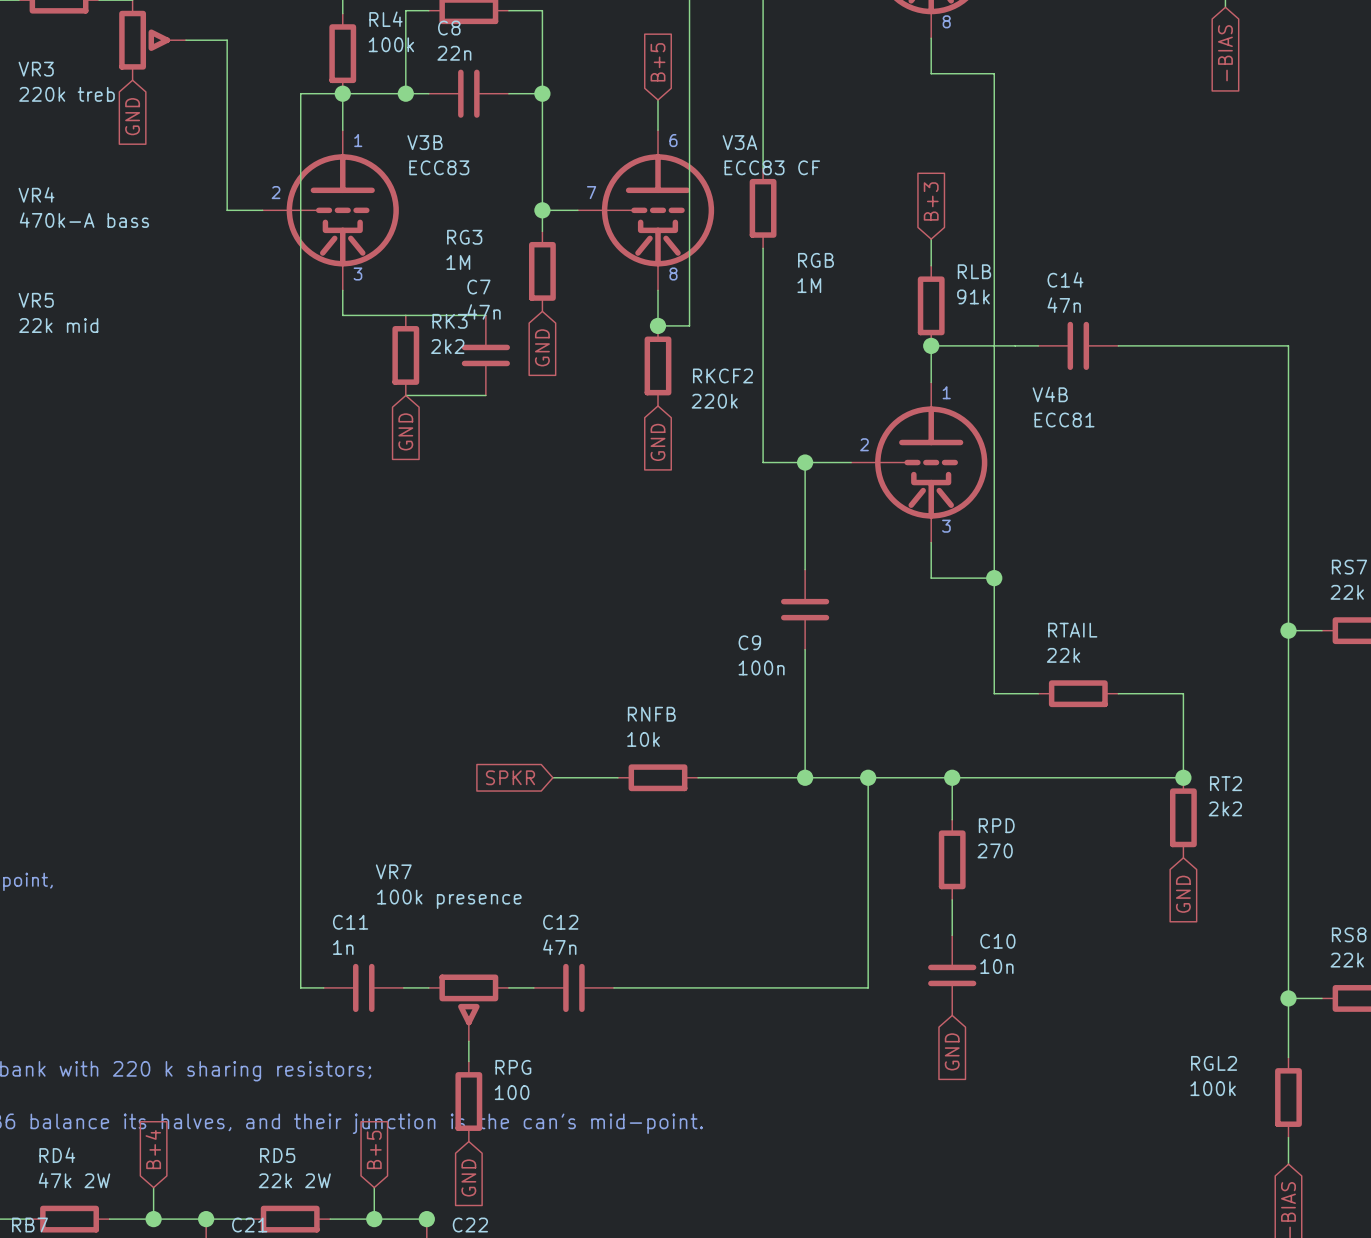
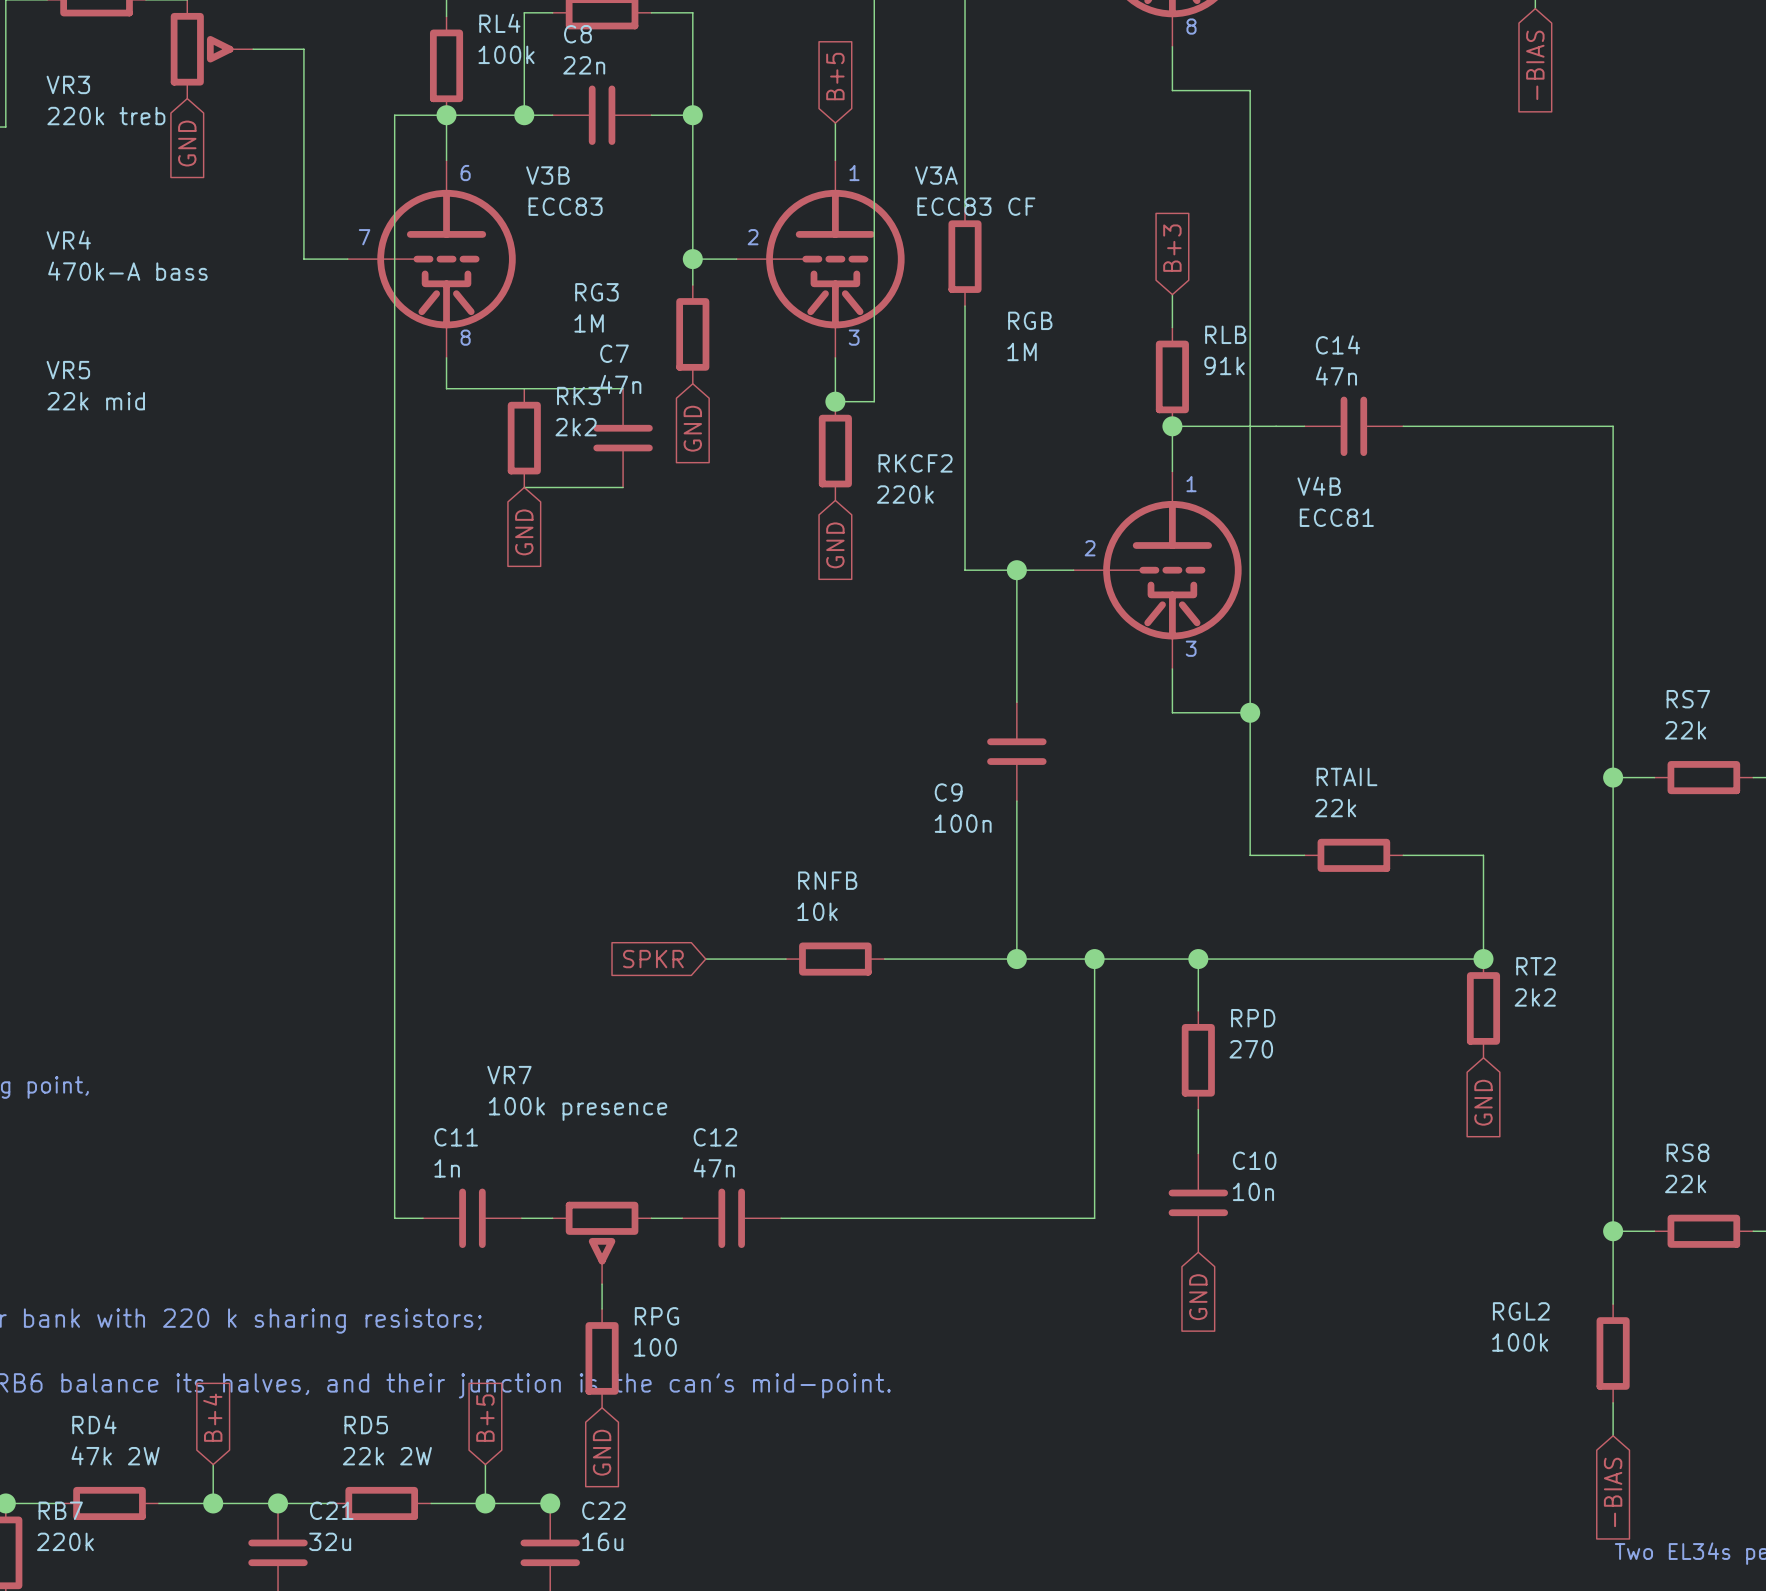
text: 1 (358, 140) -> 6 (465, 173)
text: 6 (673, 140) -> 1 (854, 173)
text: 2 (276, 192) -> 7 (364, 237)
text: 7 (591, 192) -> 2 (753, 237)
text: 3 (357, 274) -> 8 (465, 337)
text: 8 (673, 274) -> 3 (854, 337)

